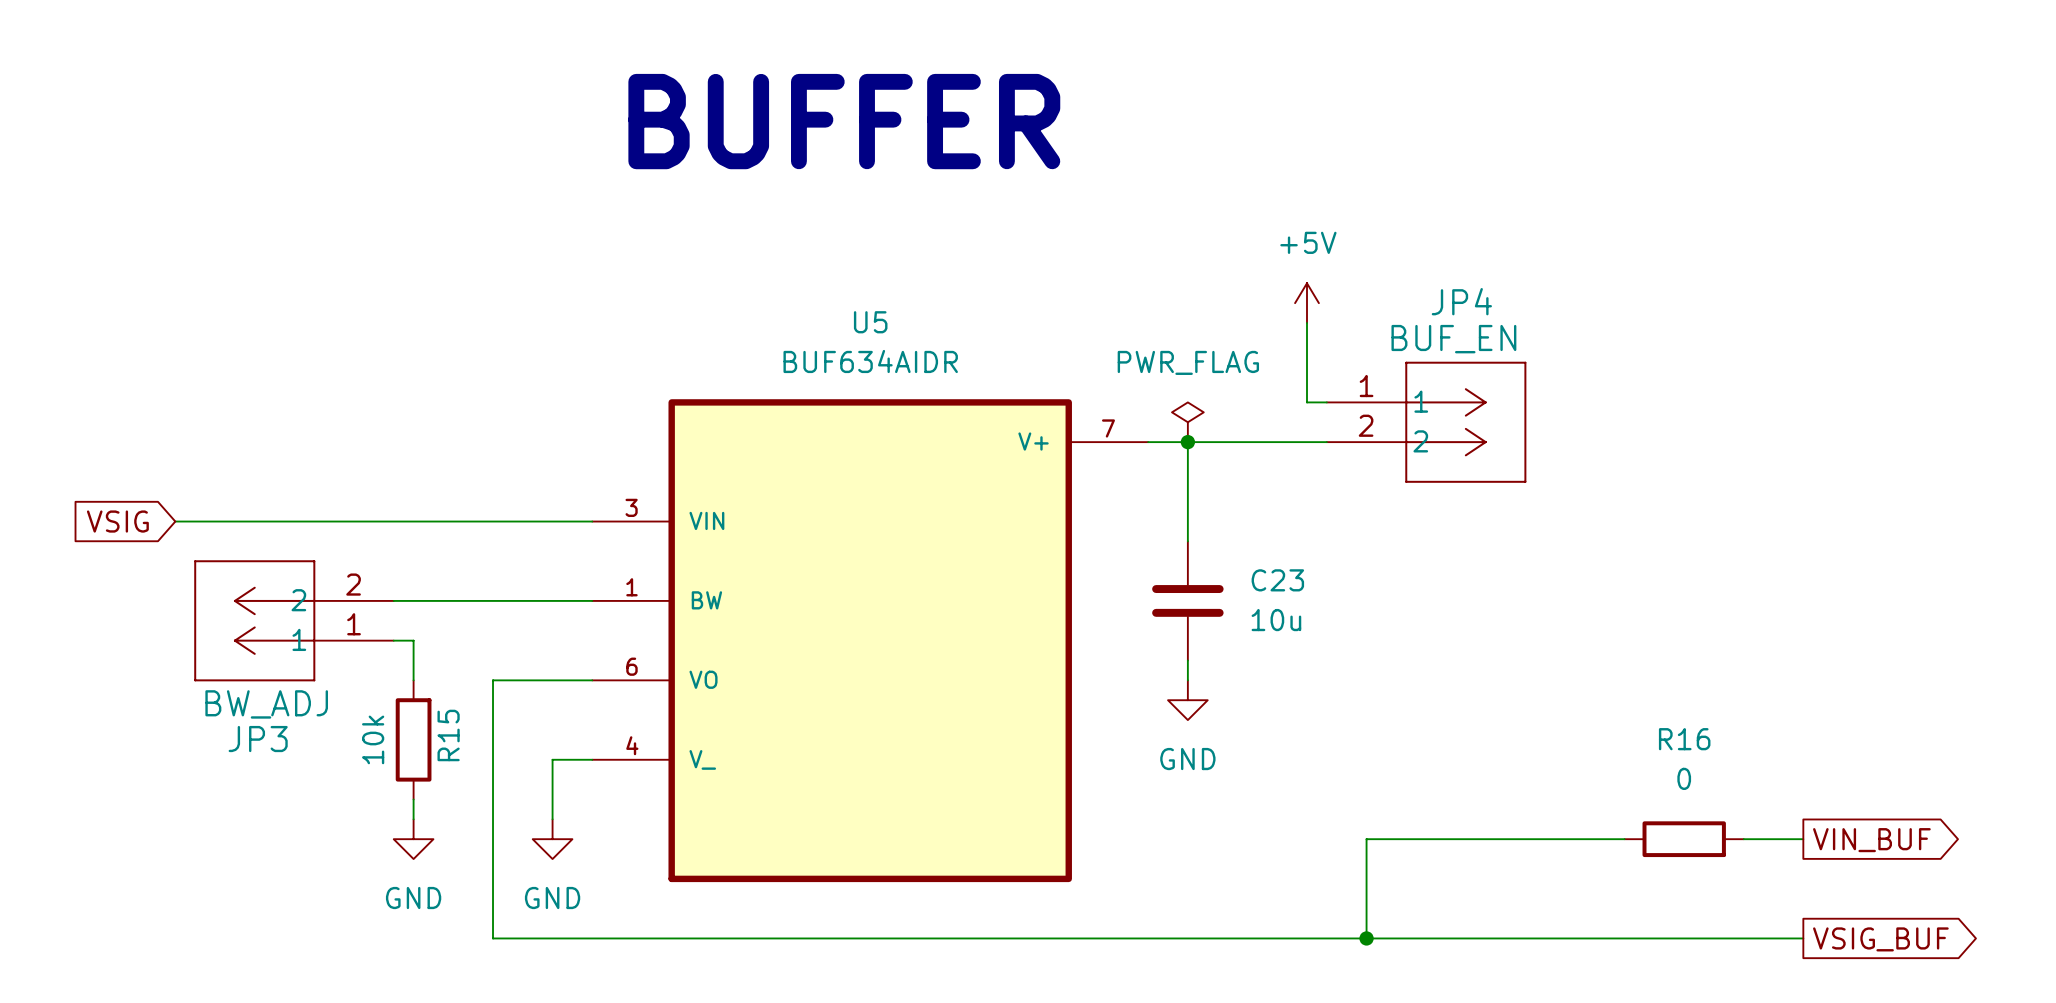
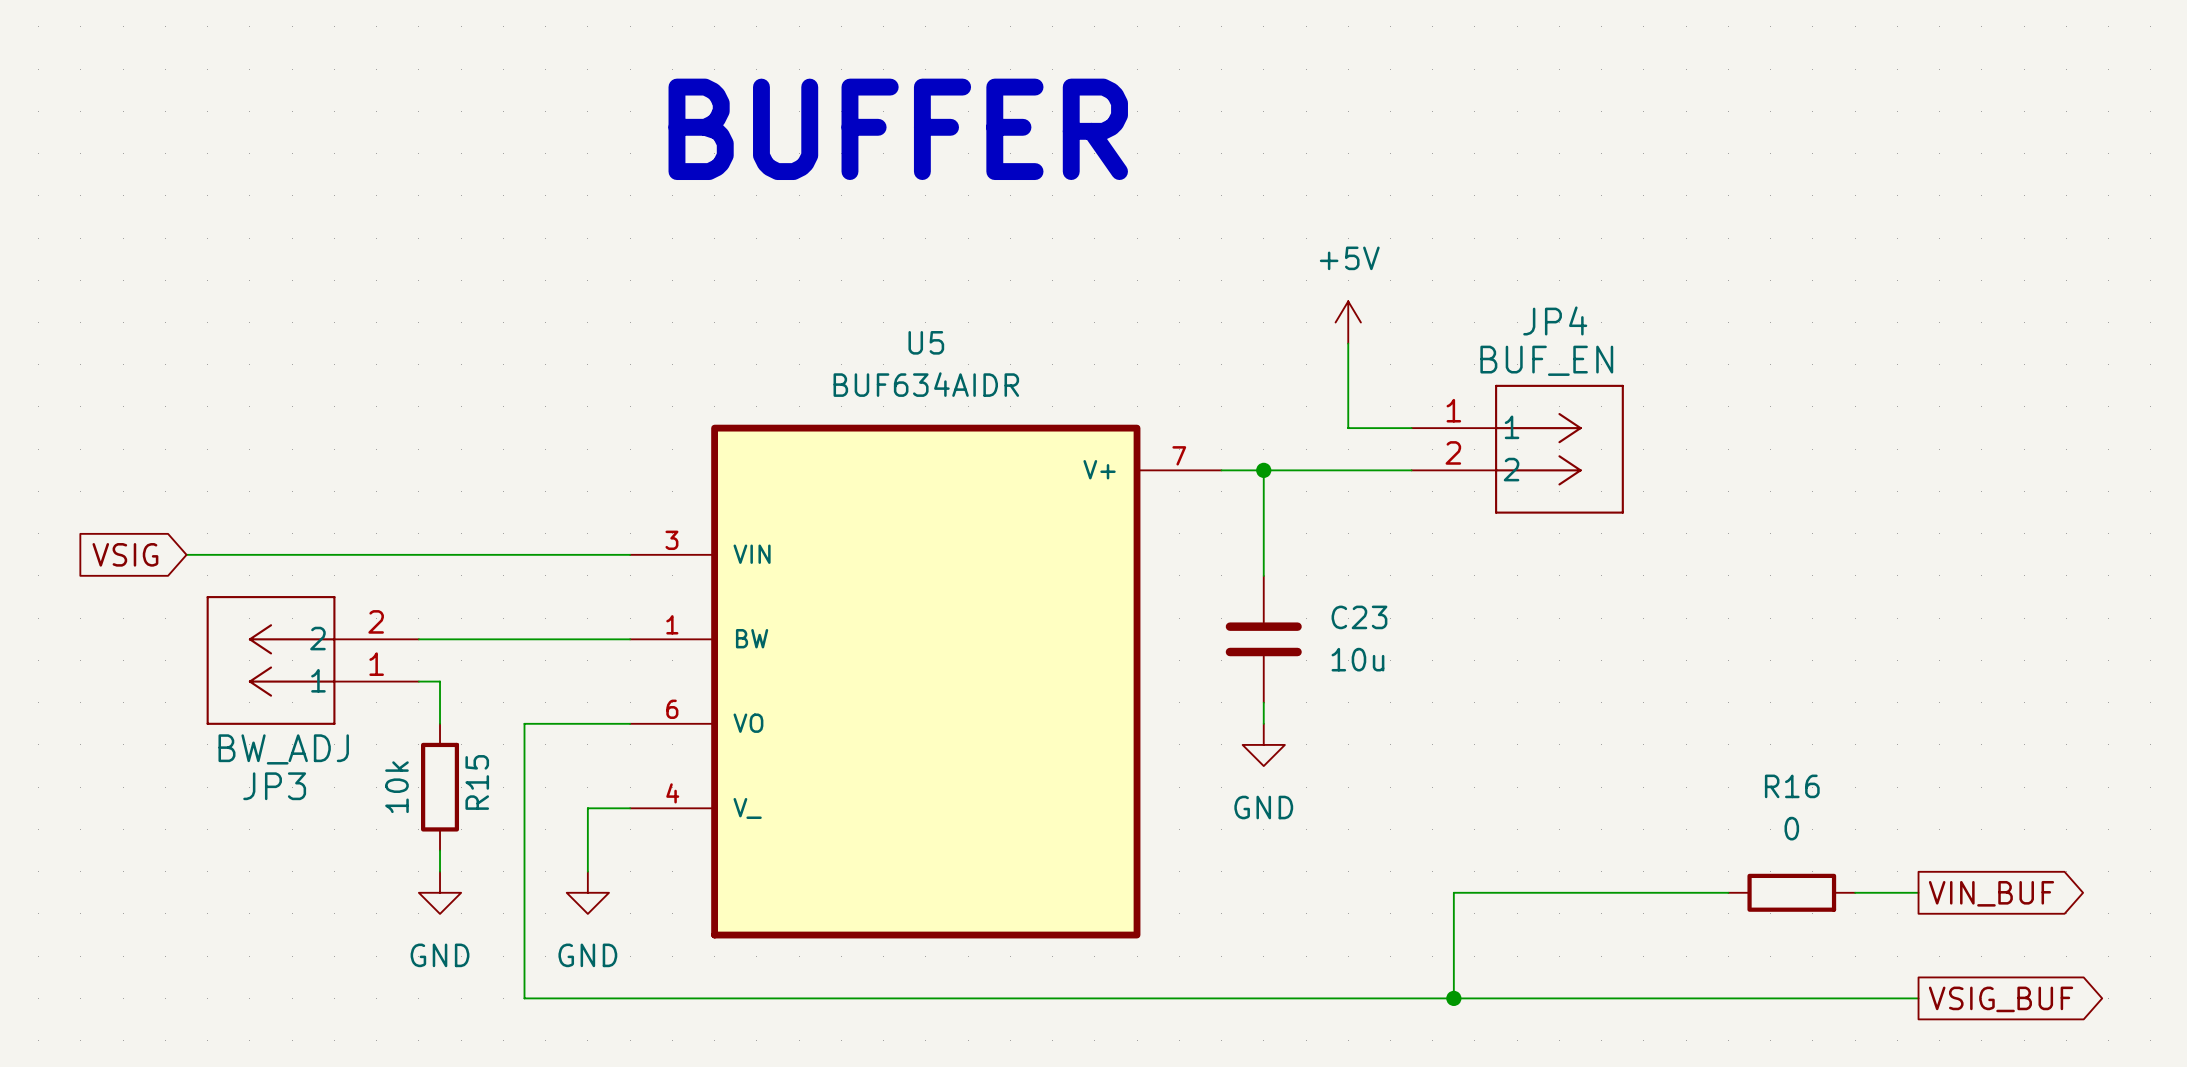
power symbol position: +5V (1306, 303) -> +5V (1348, 322)
wire: (1306, 323) (1306, 402) -> (1348, 343) (1348, 428) (1390, 428)
power symbol: PWR_FLAG (1187, 422) -> none

